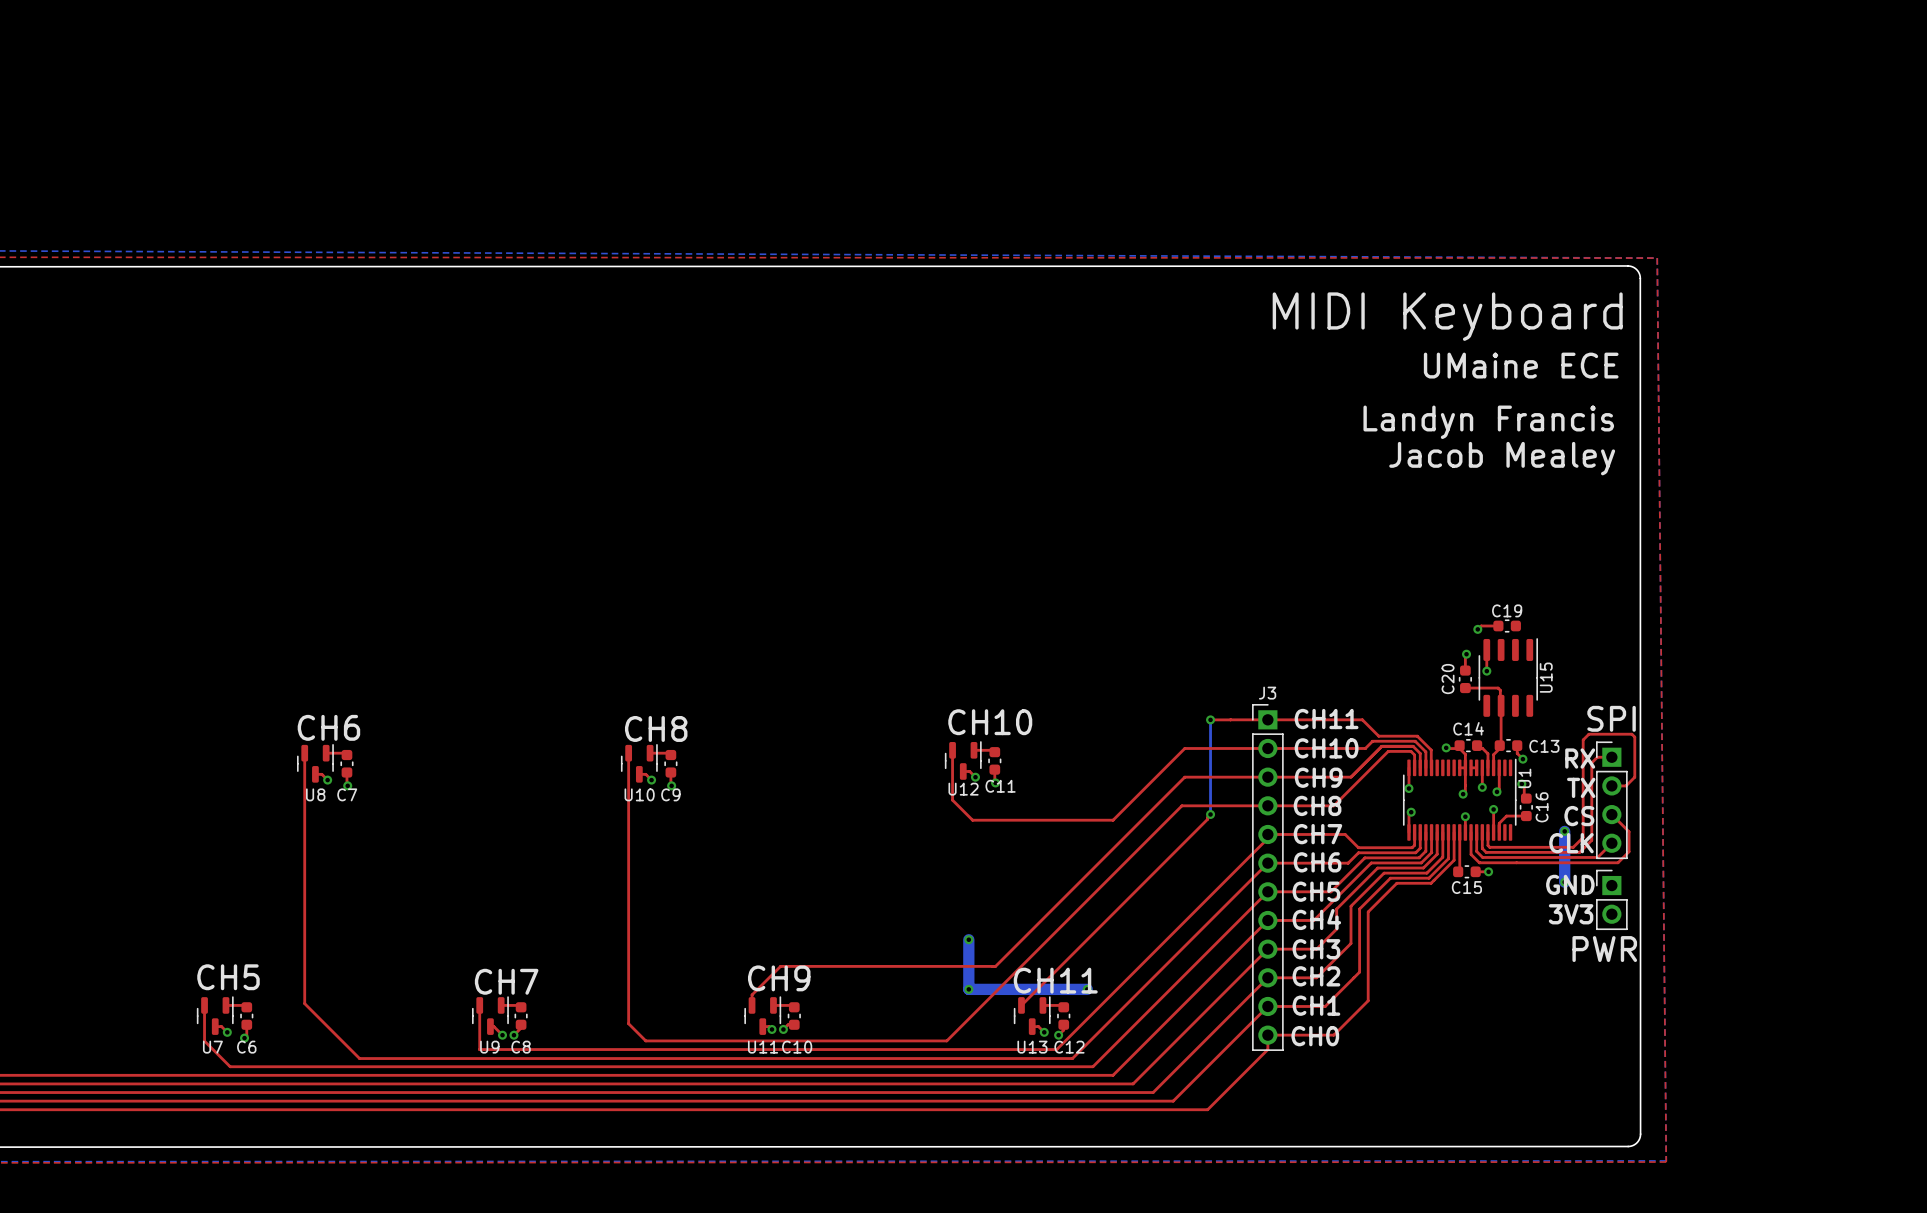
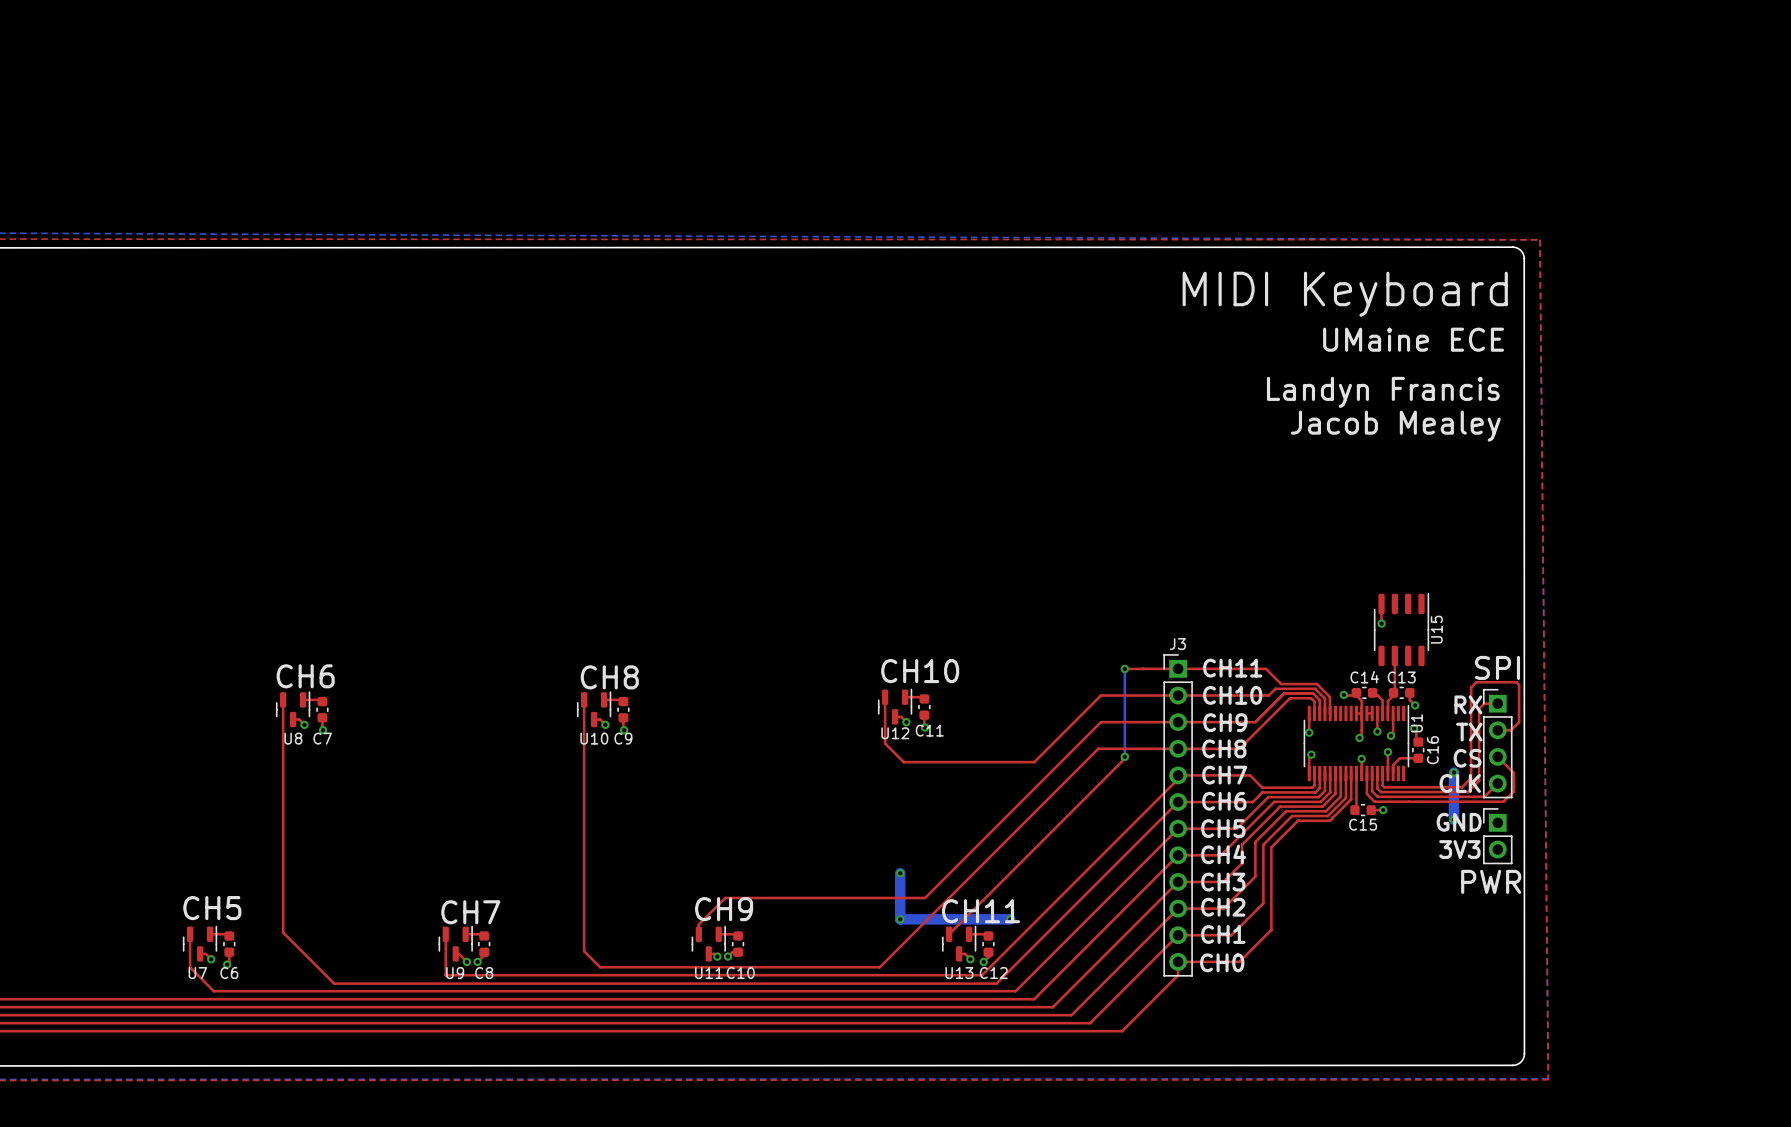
top track: (1498, 625) (1481, 625) (1477, 629) -> none
C19: (1507, 625) -> none
via: (1477, 629) -> none
top track: (1466, 654) (1465, 670) -> none
via: (1466, 654) -> none
C20: (1465, 679) -> none
top track: (1465, 688) (1498, 688) (1500, 690) (1501, 705) -> none
C13 name position: C13 (1544, 746) -> C13 (1401, 677)

